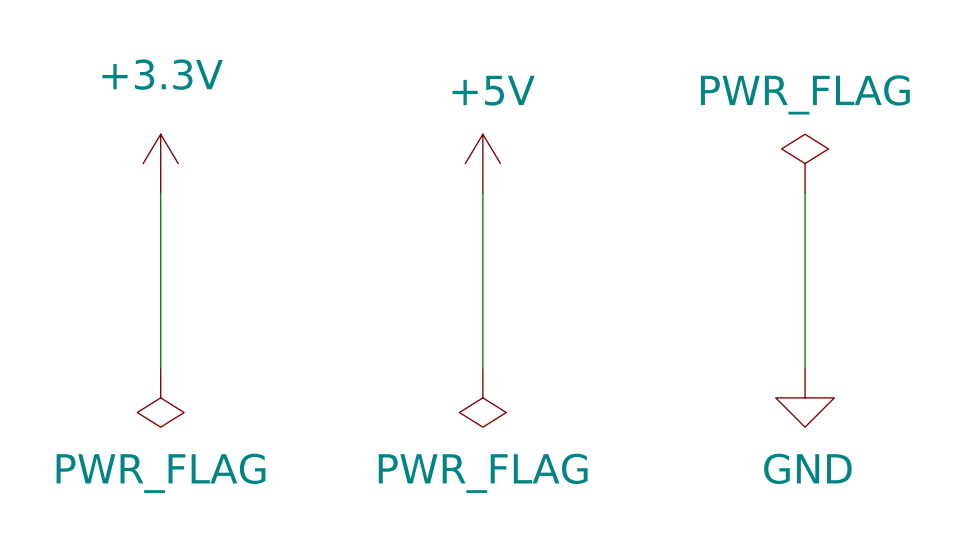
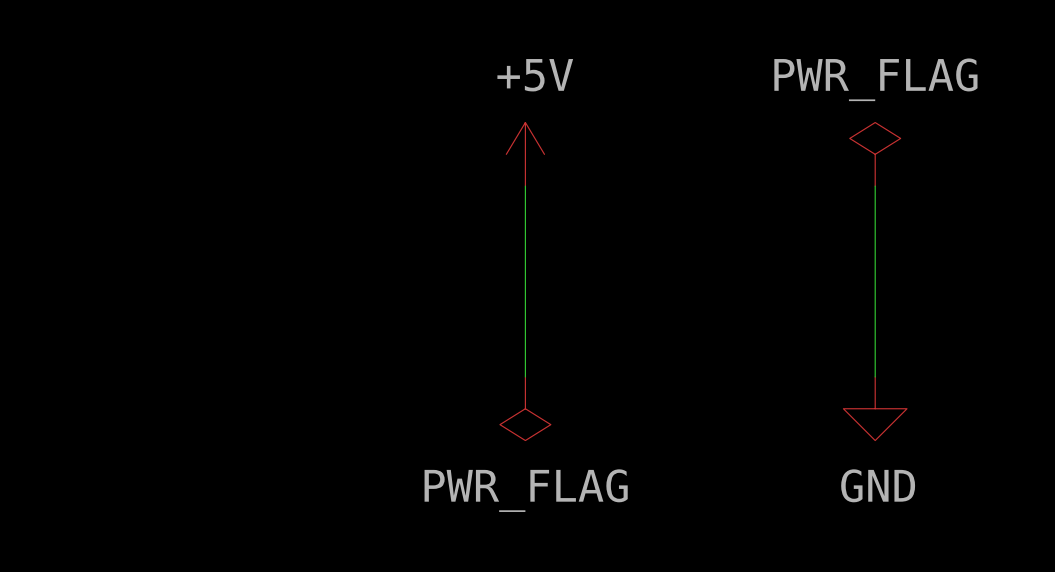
power symbol: +3.3V (160, 163) -> none
wire: (160, 192) (160, 368) -> none
power symbol: PWR_FLAG (160, 397) -> none

